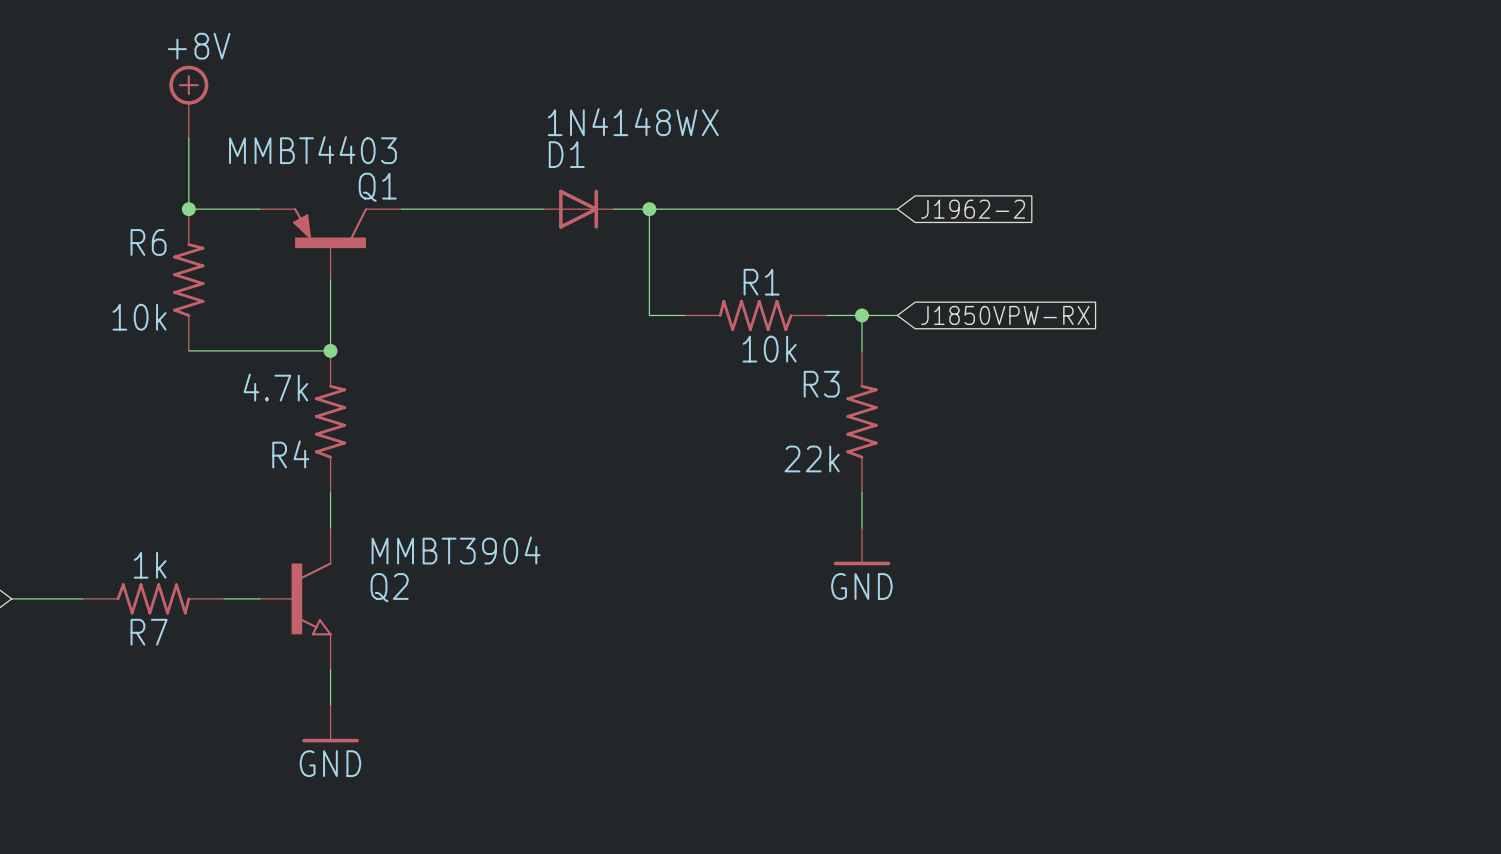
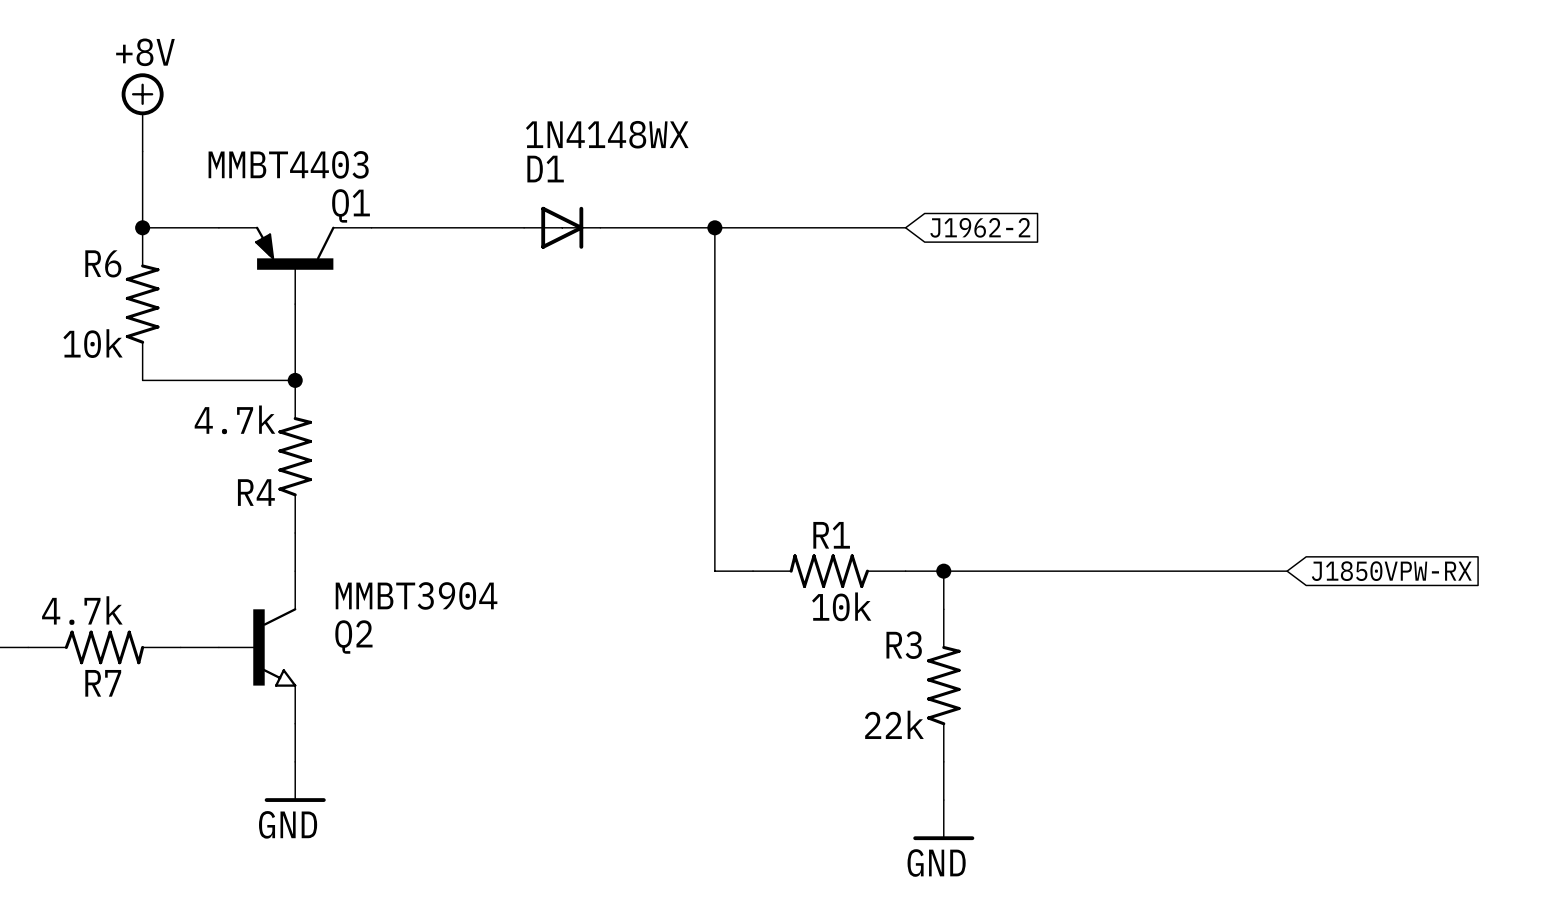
wire: (649, 209) (649, 315) (684, 315) -> none
junction position: (649, 209) -> (714, 227)
wire: none -> (714, 227) (714, 571) (753, 571)
R1 position: (755, 315) -> (829, 571)
wire: (826, 315) (897, 315) -> none
wire: (861, 315) (861, 350) -> (943, 571) (943, 609)
junction: (861, 315) -> none
global label: J1850VPW-RX (1005, 315) -> none
R3 position: (861, 421) -> (943, 685)
wire: (861, 492) (861, 528) -> (943, 761) (943, 800)
wire: none -> (905, 571) (1287, 571)
junction: none -> (943, 571)
global label: none -> J1850VPW-RX (1391, 571)
power symbol position: GND (861, 546) -> GND (943, 820)
R7 value: 1k (150, 565) -> 4.7k (82, 610)

